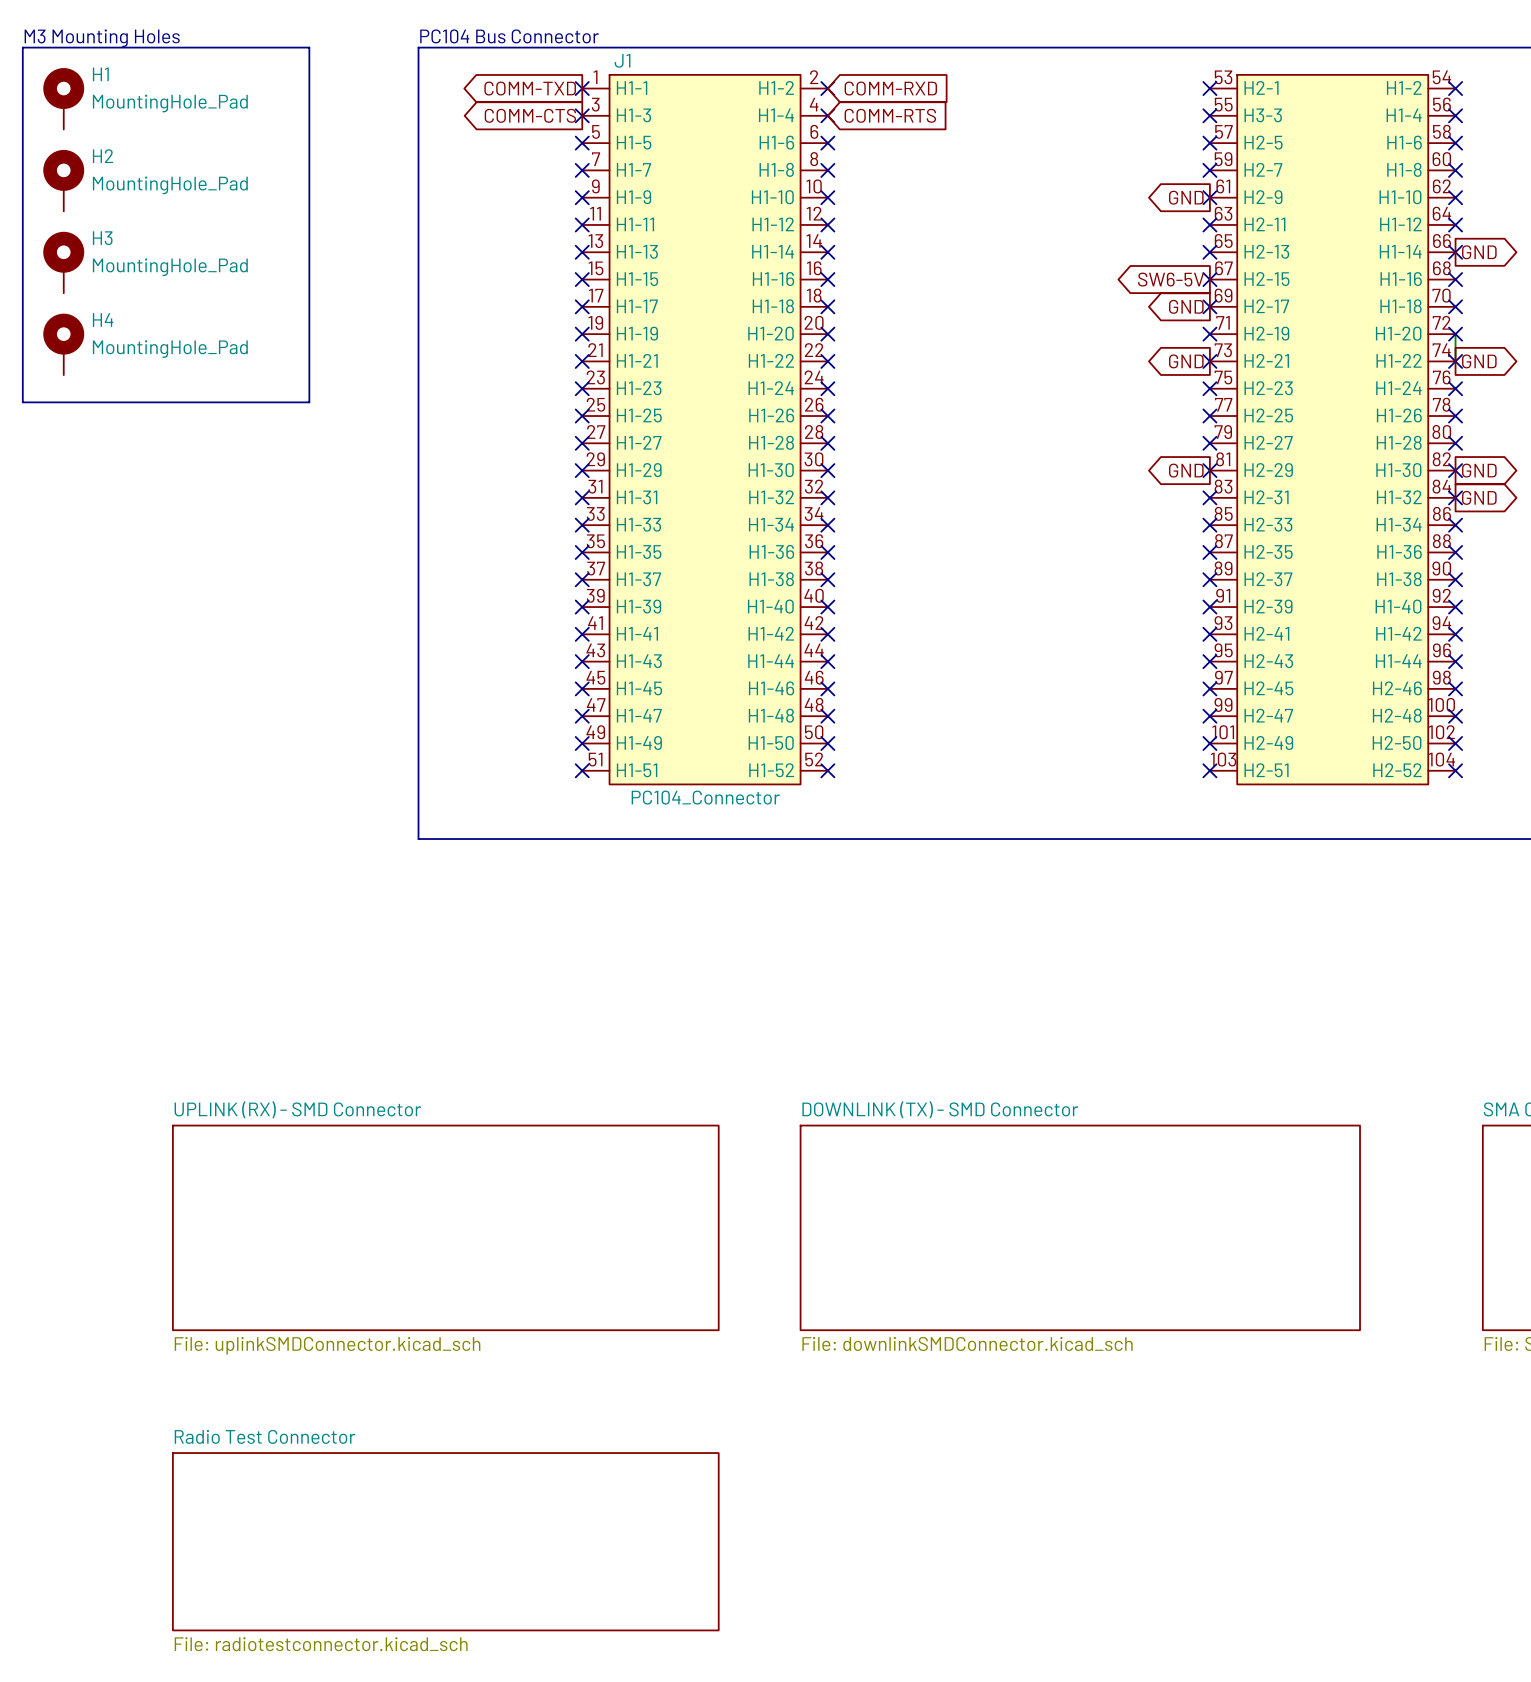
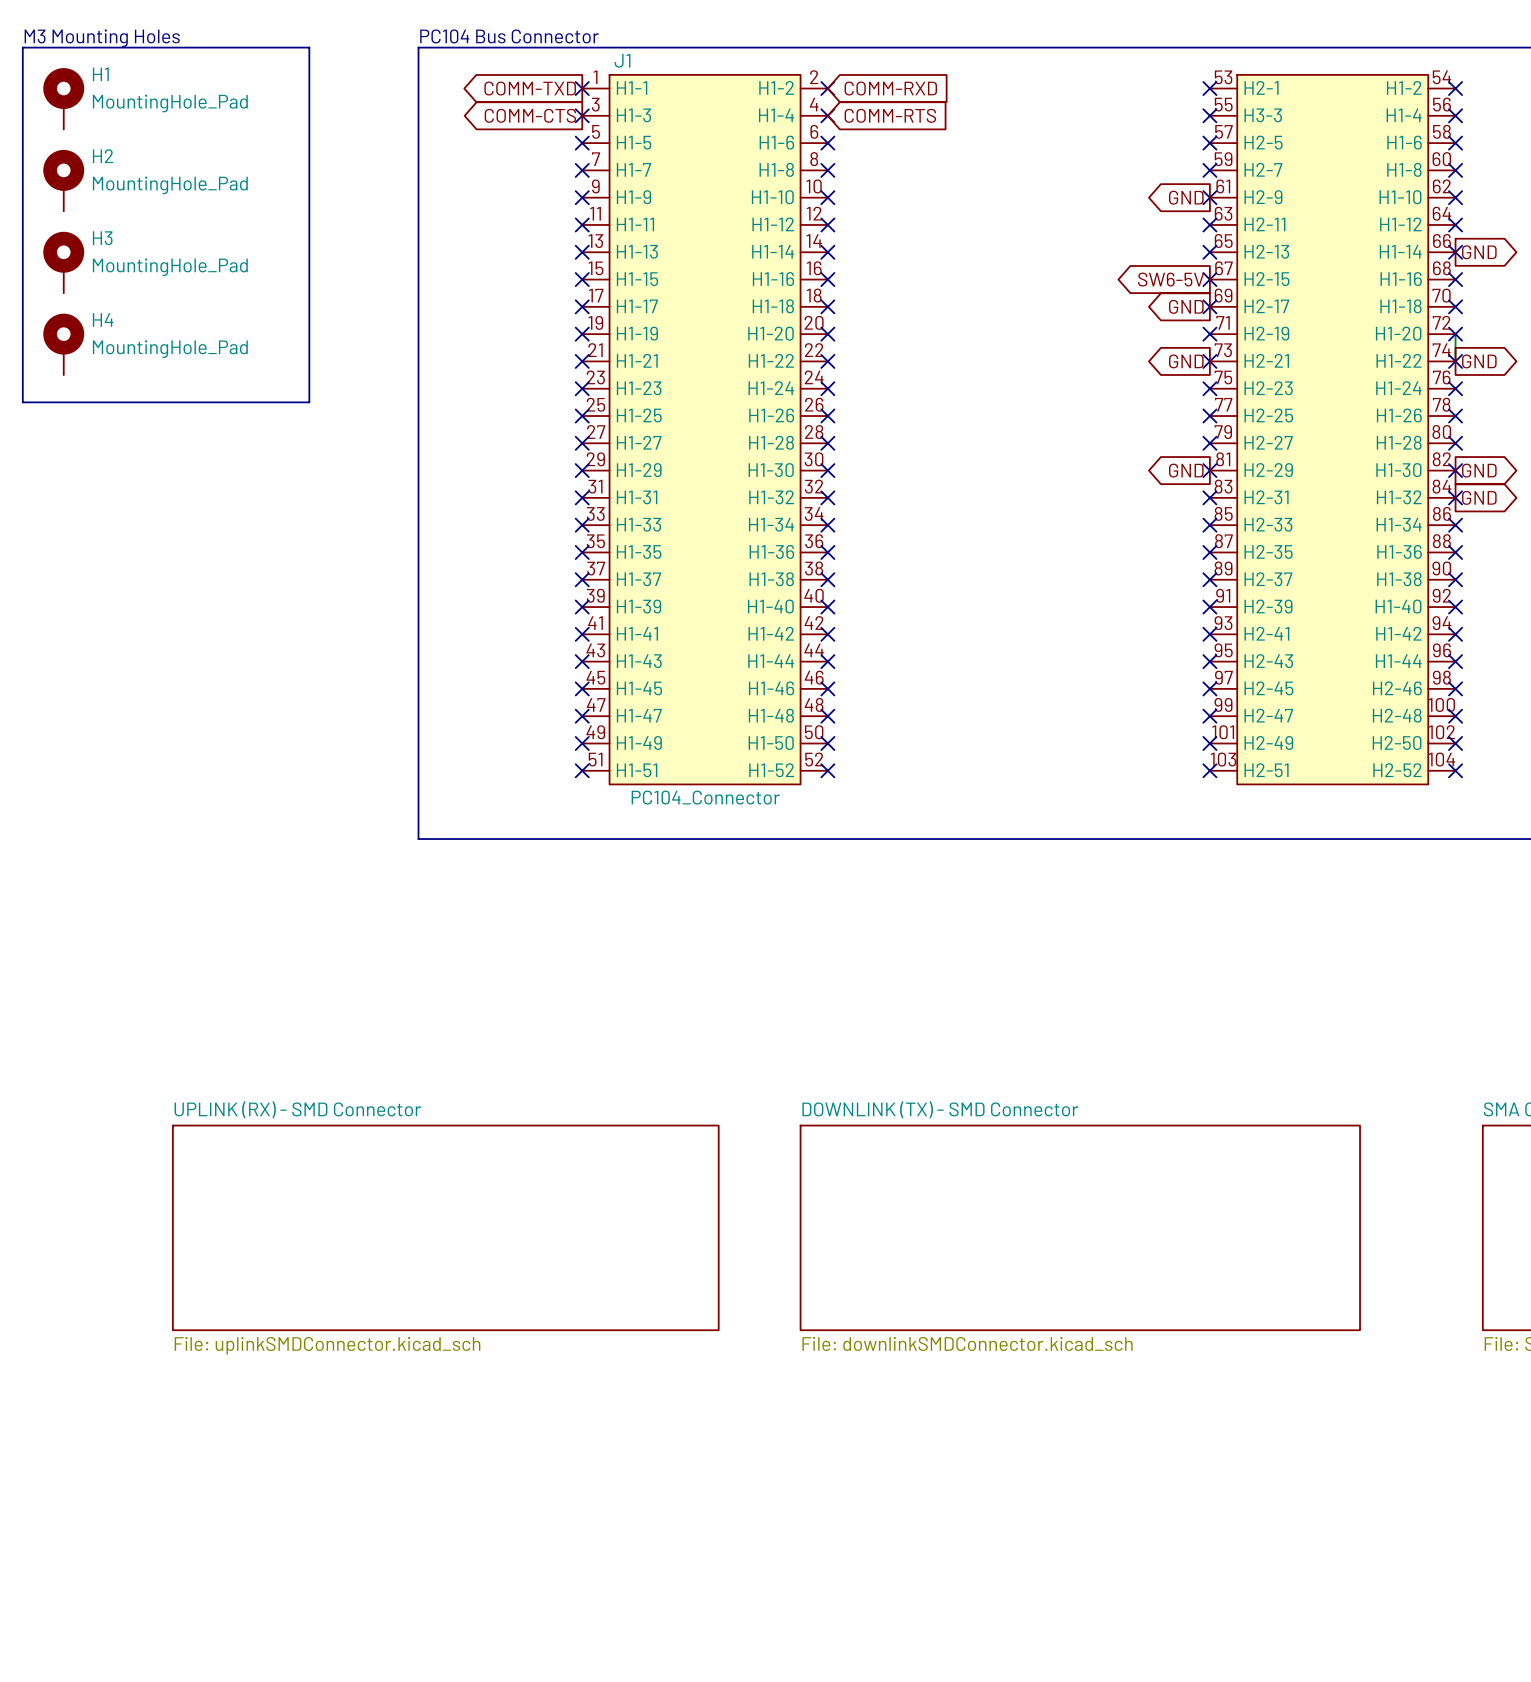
sheet Radio Test Connector: File: radiotestconnector.kicad_sch (445, 1541) -> none

